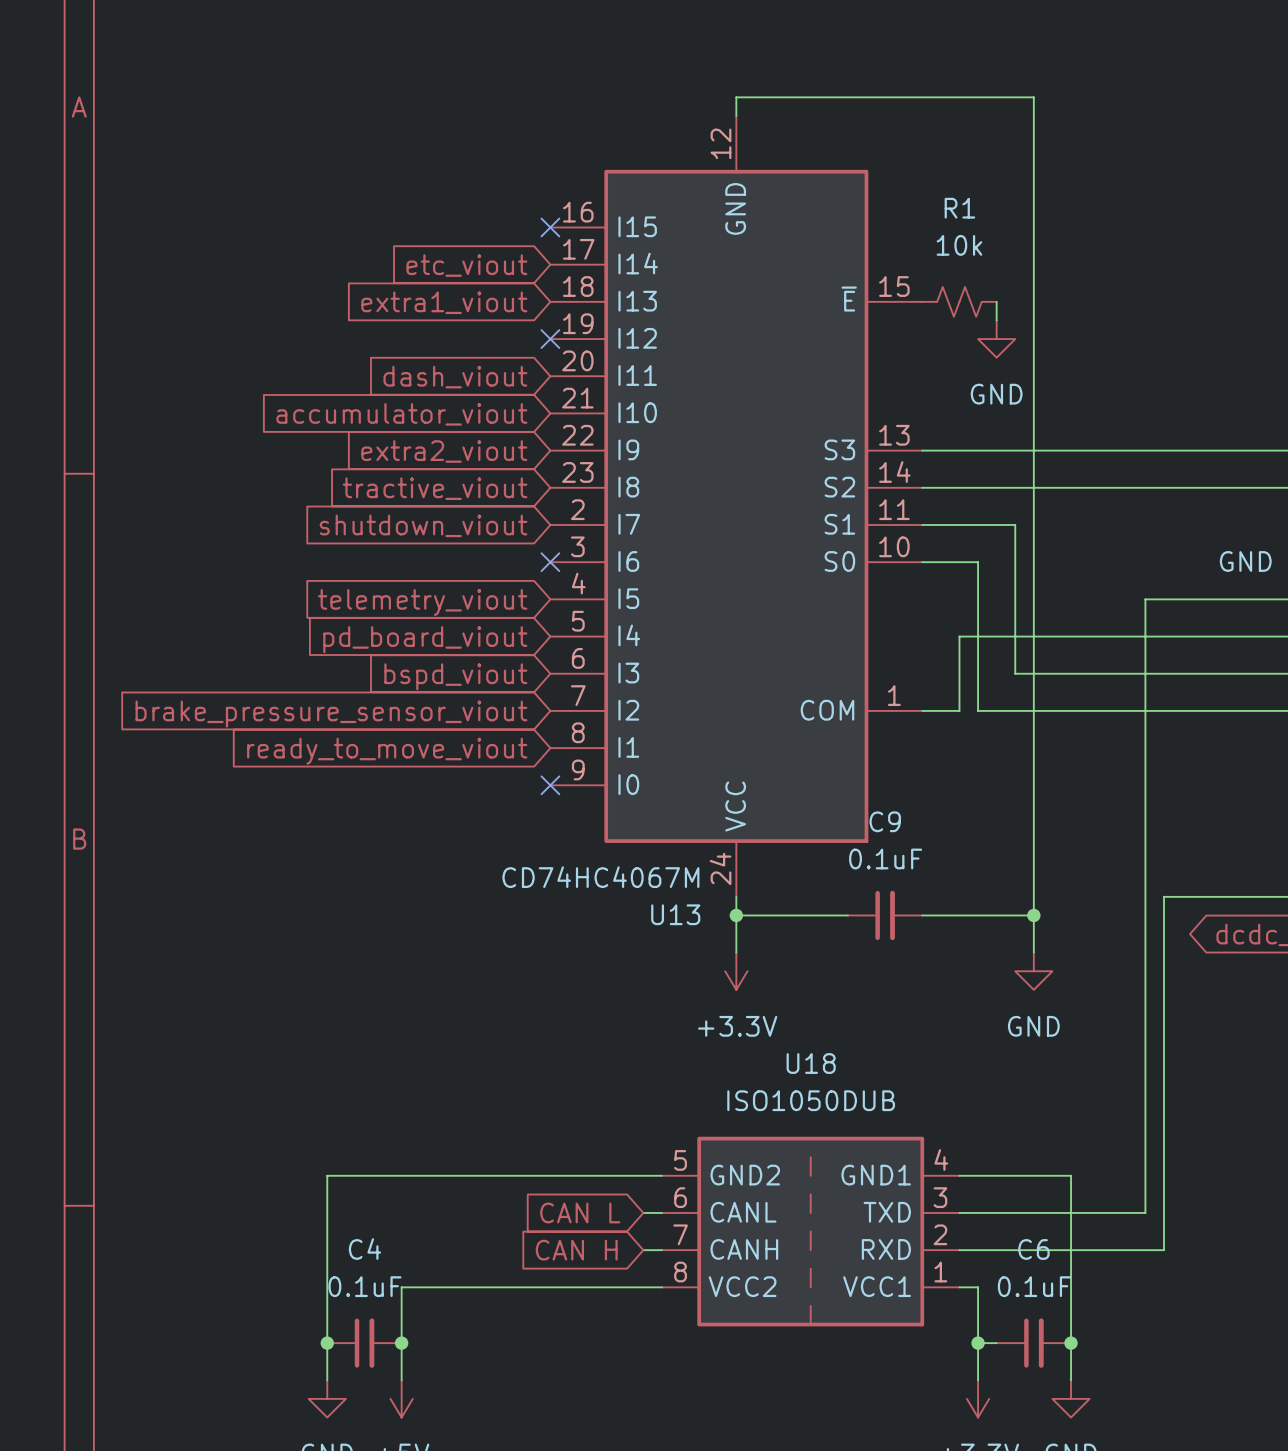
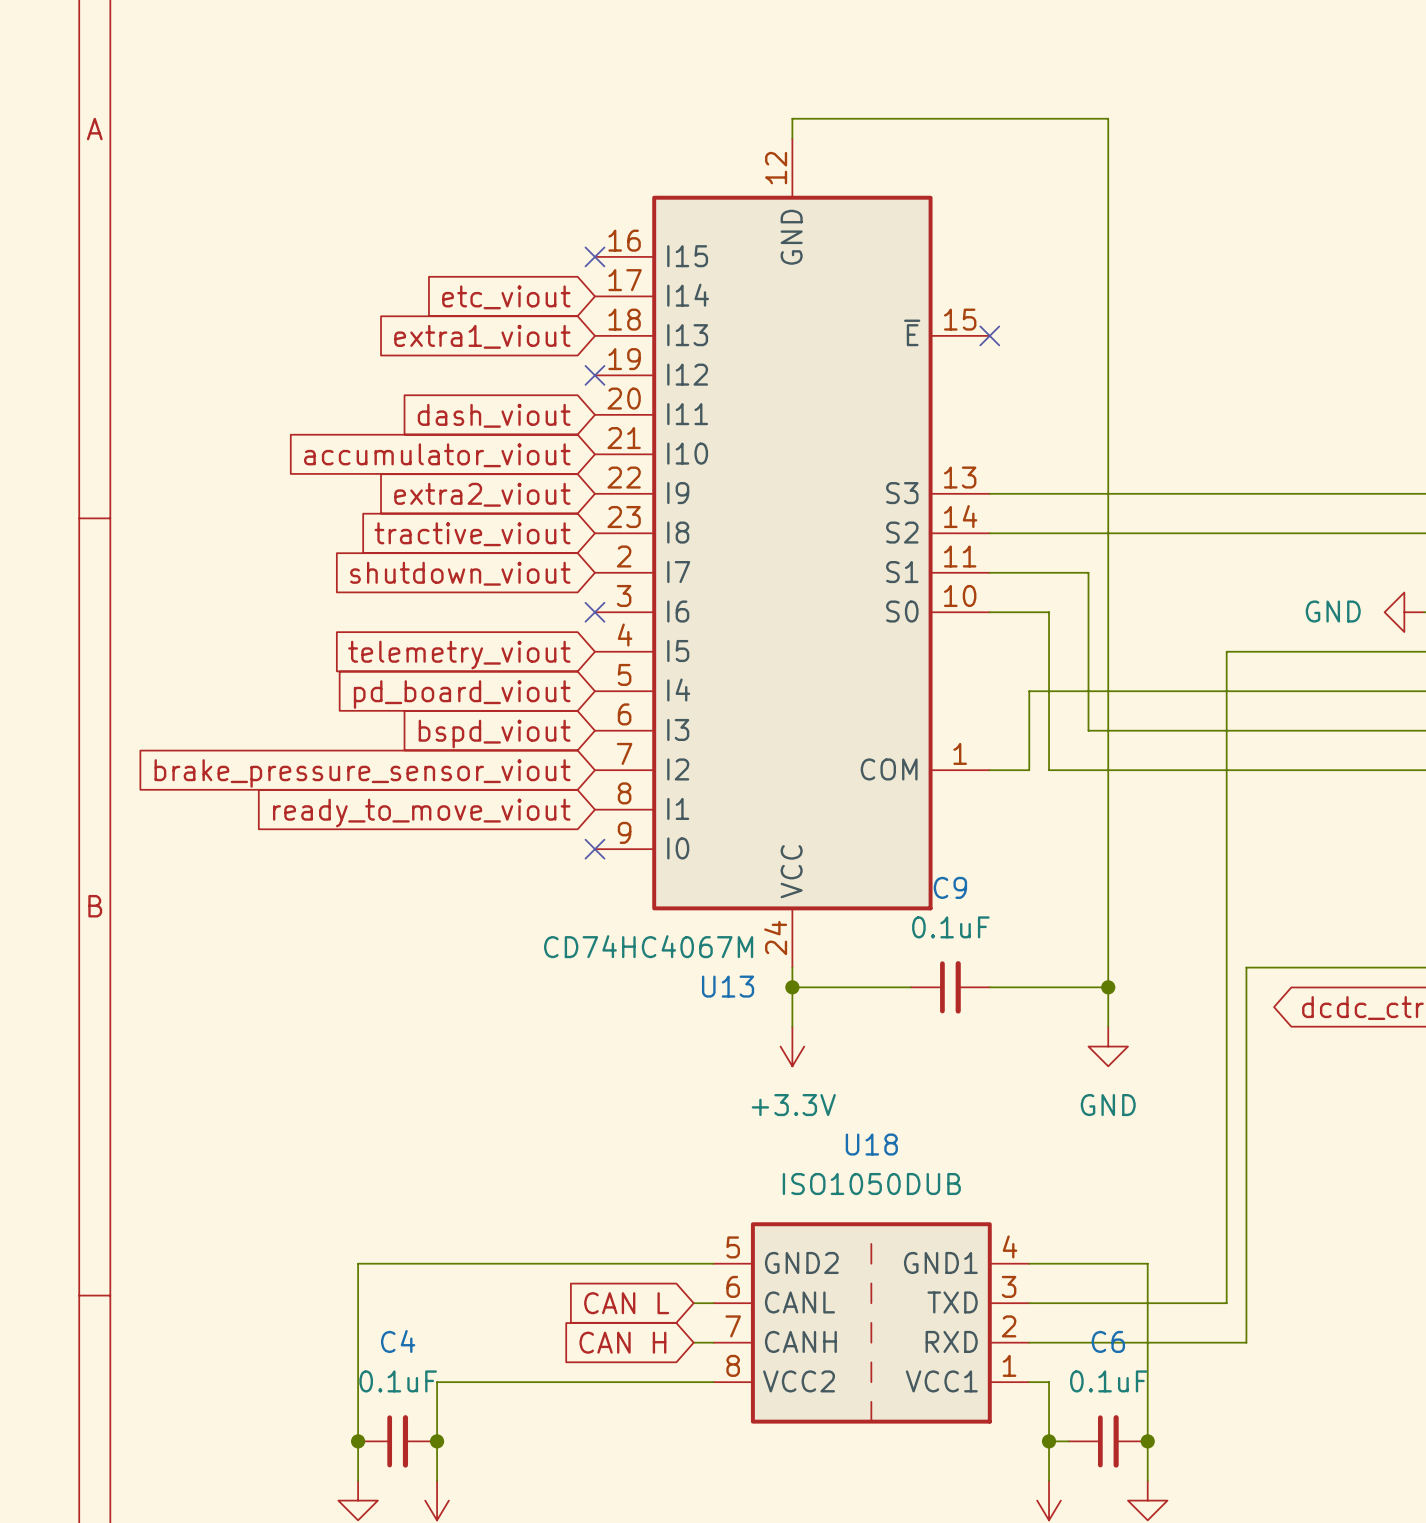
no-connect mark: none -> (989, 335)
R1: 10k (959, 301) -> none
wire: (996, 301) (996, 320) -> none
power symbol: GND (996, 339) -> none

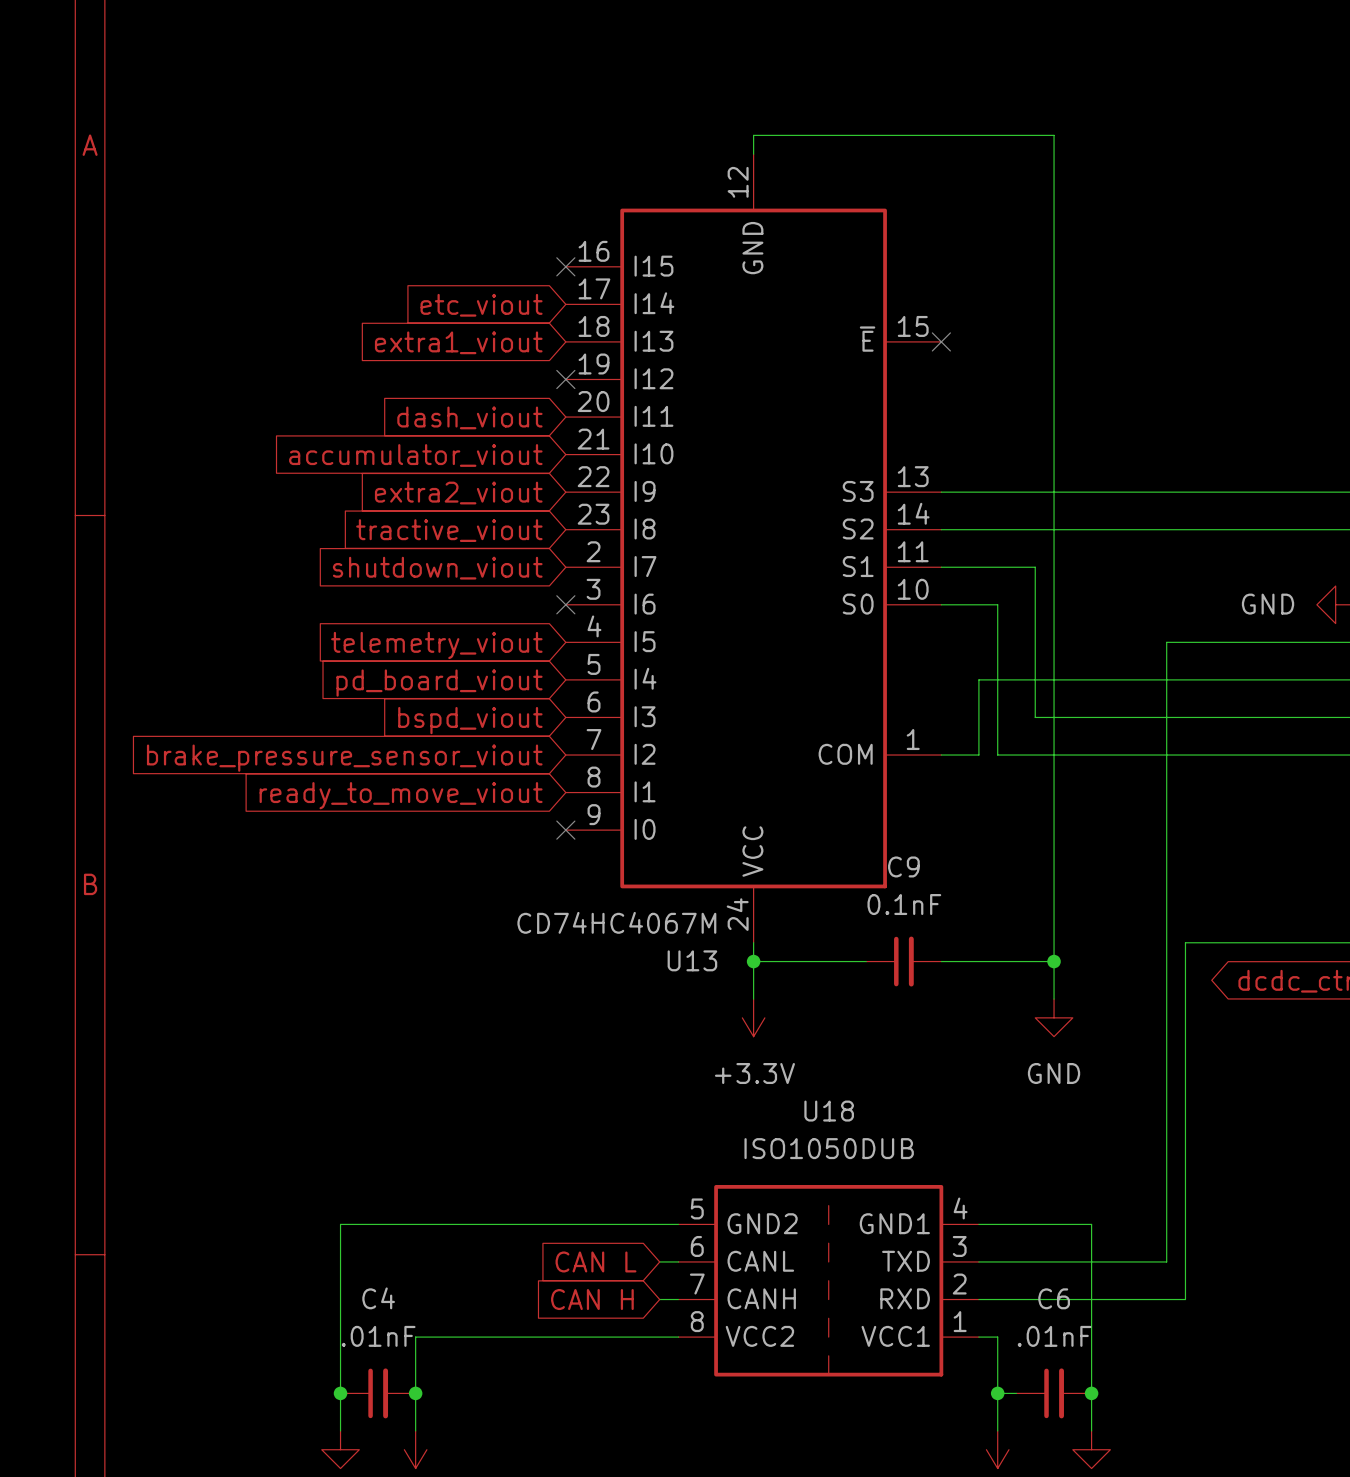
C9 value: 0.1uF (950, 927) -> 0.1nF (904, 904)
C4 value: 0.1uF (398, 1381) -> .01nF (378, 1336)
C6 value: 0.1uF (1108, 1381) -> .01nF (1054, 1336)

